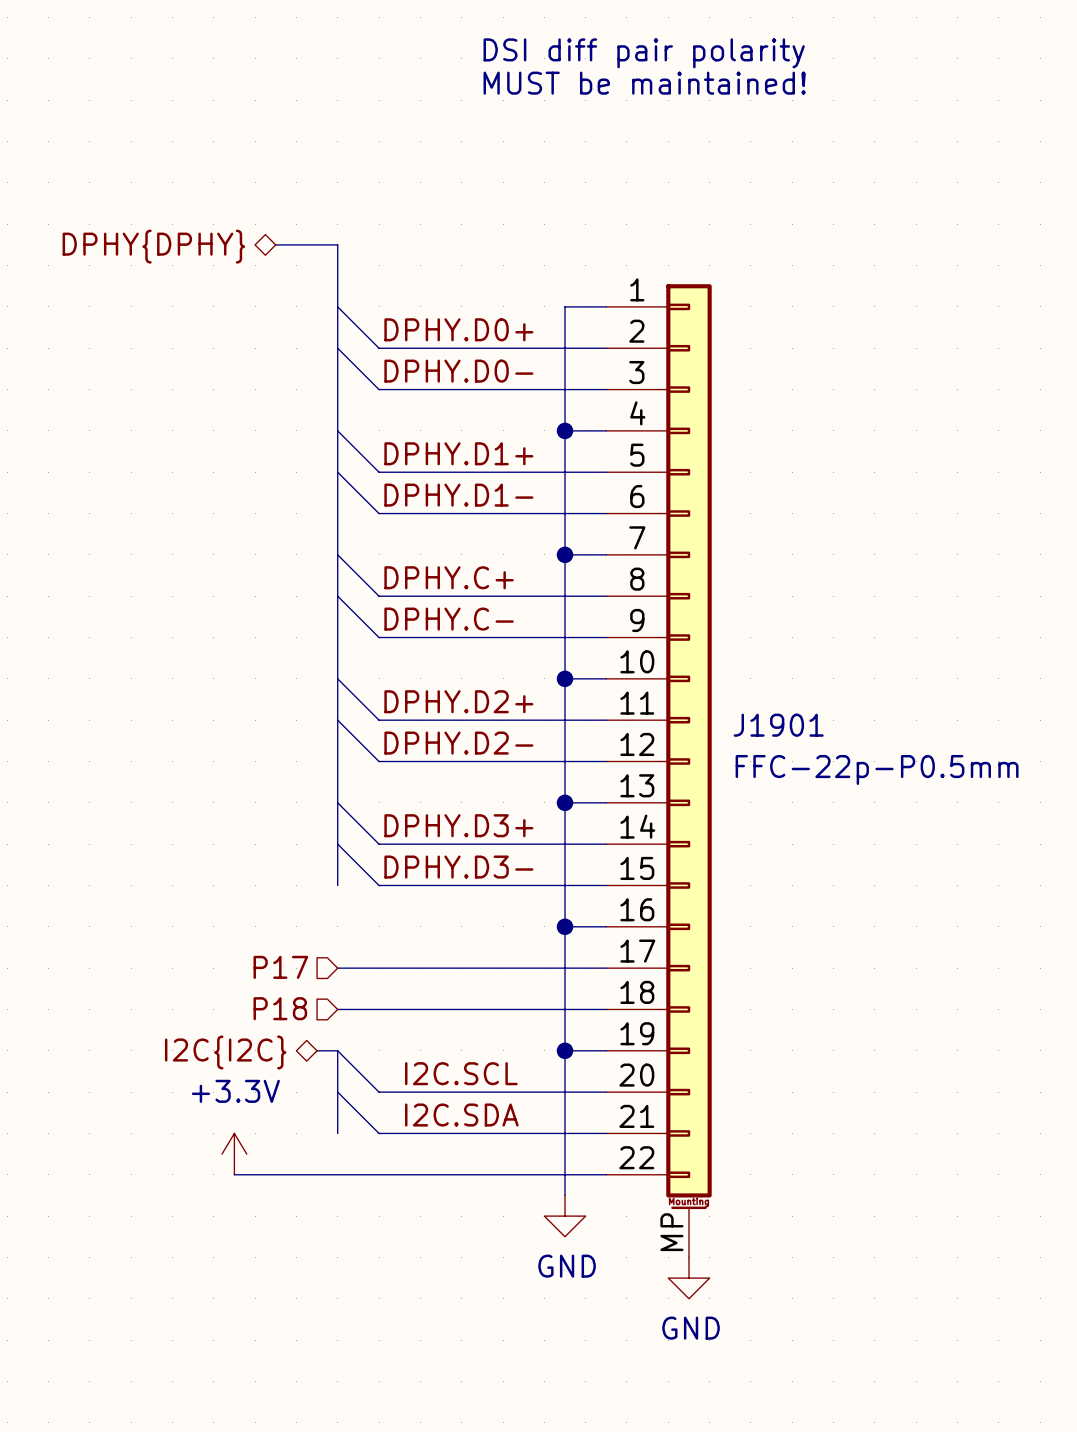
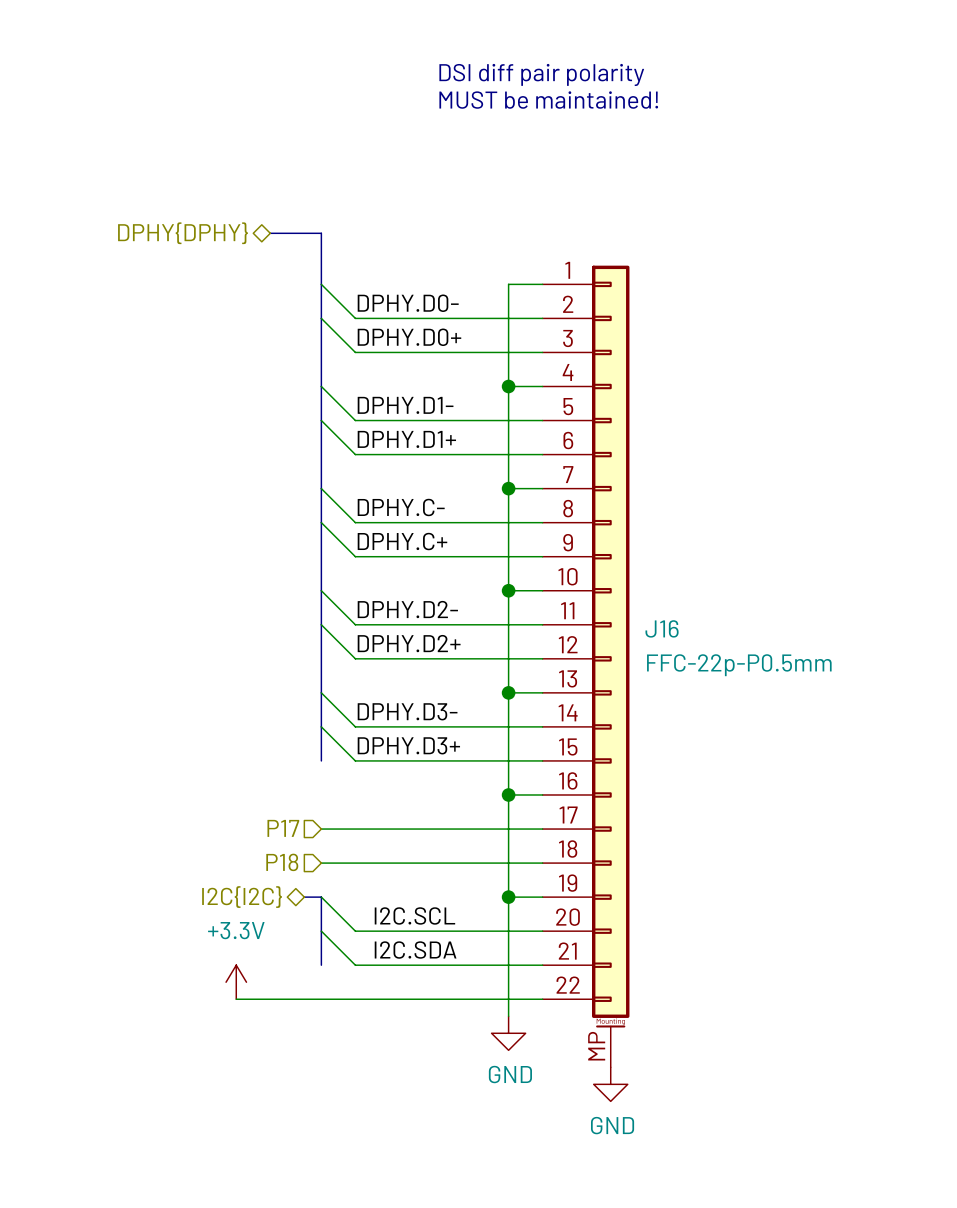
label: DPHY.D0+ (458, 329) -> DPHY.D0- (408, 303)
label: DPHY.D0- (458, 371) -> DPHY.D0+ (409, 337)
label: DPHY.D1+ (458, 453) -> DPHY.D1- (405, 405)
label: DPHY.D1- (458, 495) -> DPHY.D1+ (406, 439)
label: DPHY.C+ (449, 577) -> DPHY.C- (401, 507)
label: DPHY.C- (449, 619) -> DPHY.C+ (402, 541)
label: DPHY.D2+ (458, 701) -> DPHY.D2- (407, 609)
J1901 name: J1901 (778, 725) -> J16 (662, 628)
label: DPHY.D2- (458, 743) -> DPHY.D2+ (409, 643)
label: DPHY.D3+ (458, 825) -> DPHY.D3- (407, 711)
label: DPHY.D3- (458, 867) -> DPHY.D3+ (408, 745)

